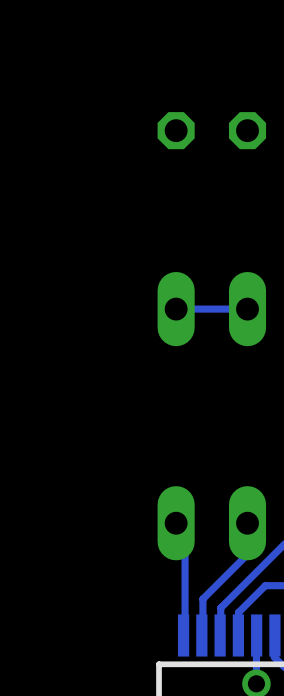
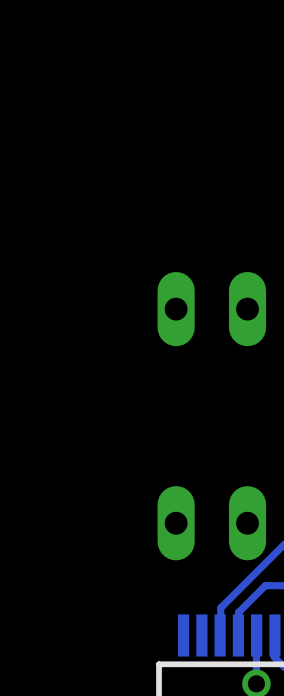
part: (211, 130) -> none
track: (247, 309) (176, 309) -> none
track: (176, 523) (185, 532) (183, 635) -> none
track: (247, 523) (247, 554) (202, 599) (201, 635) -> none

